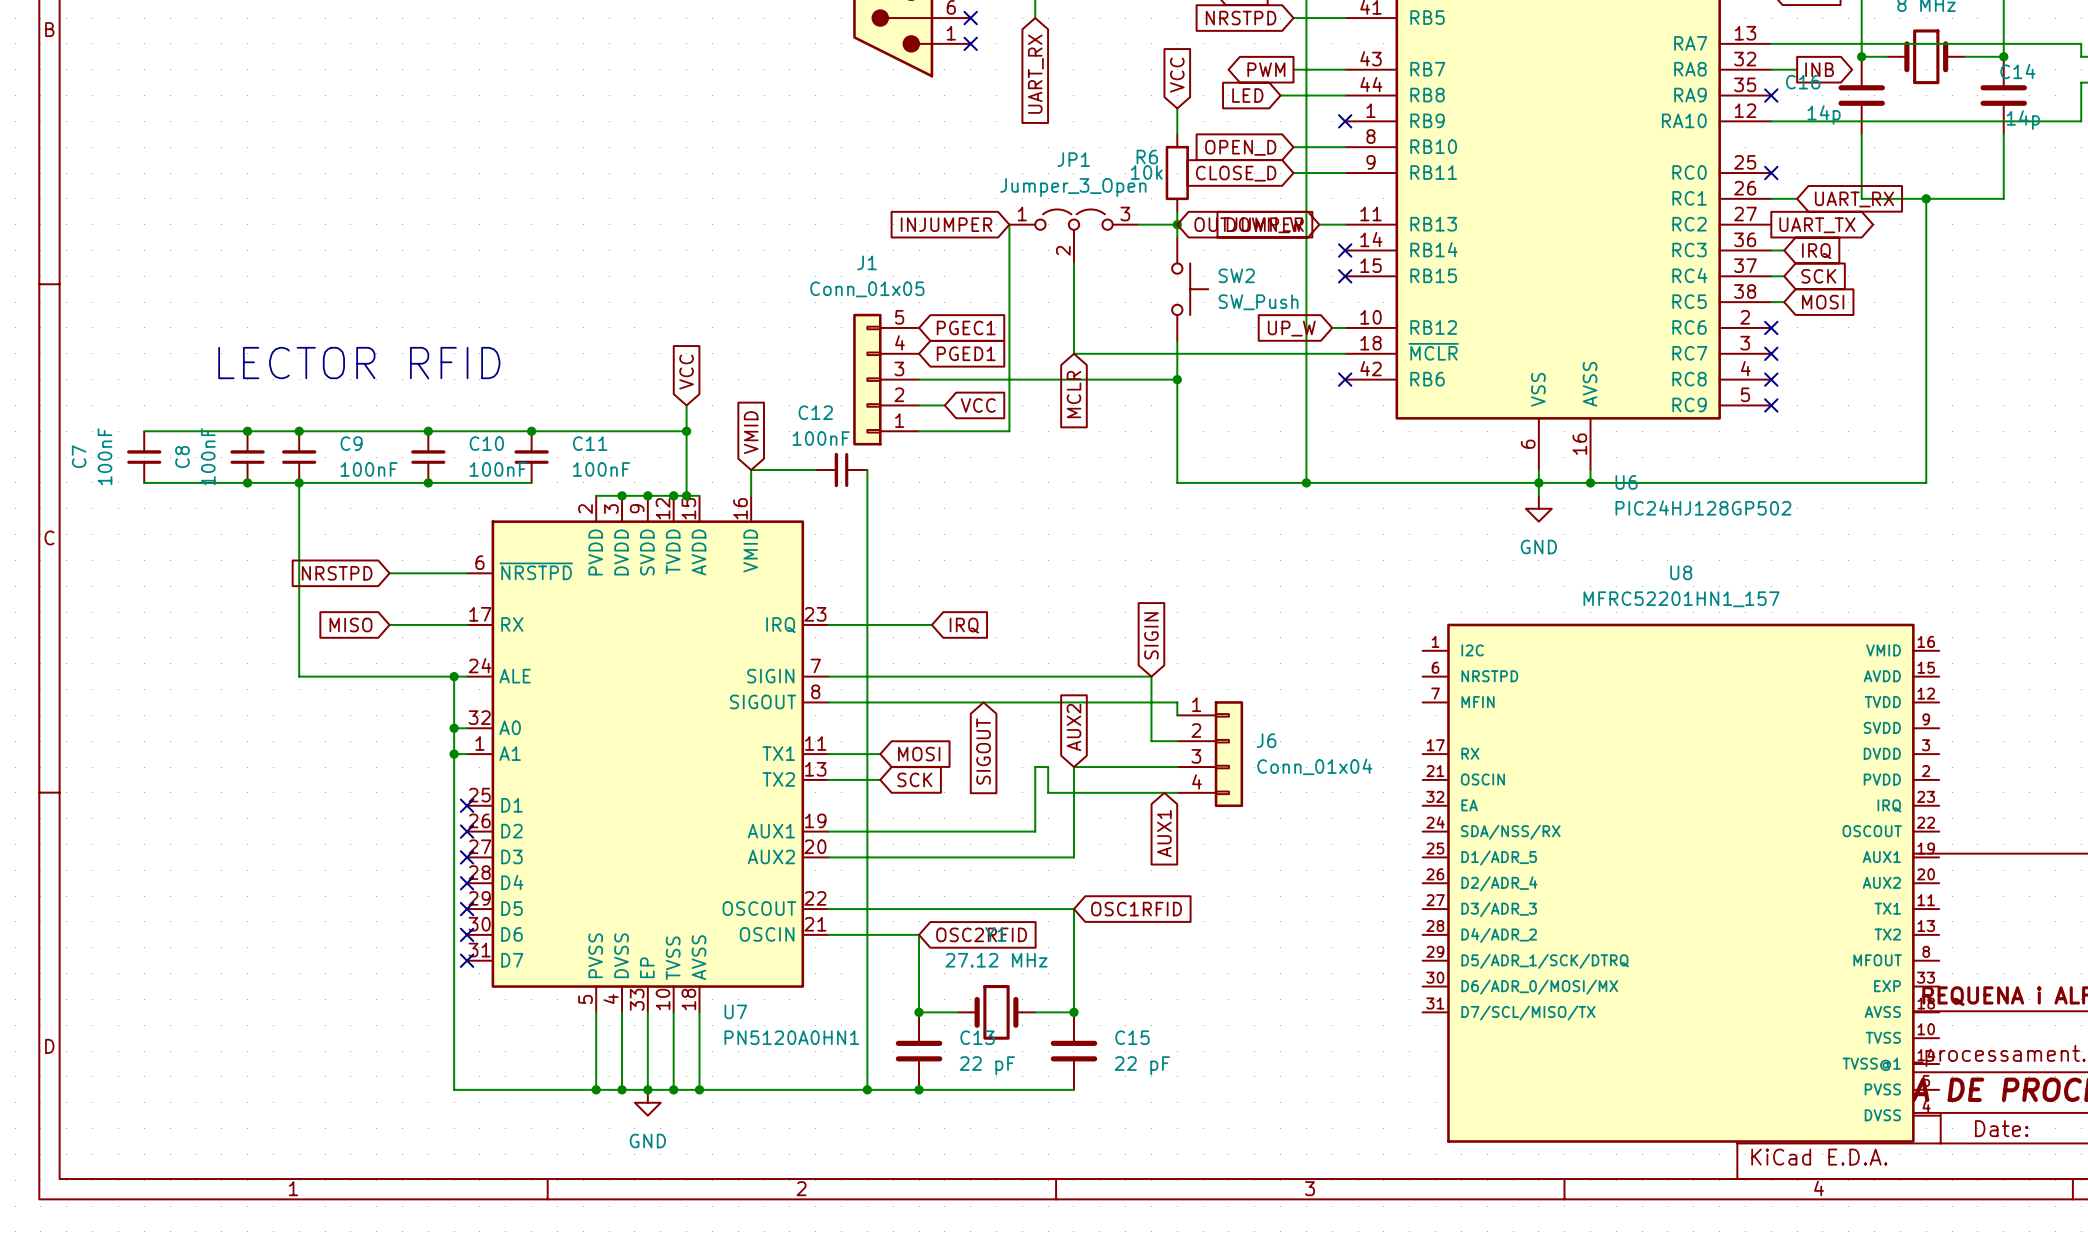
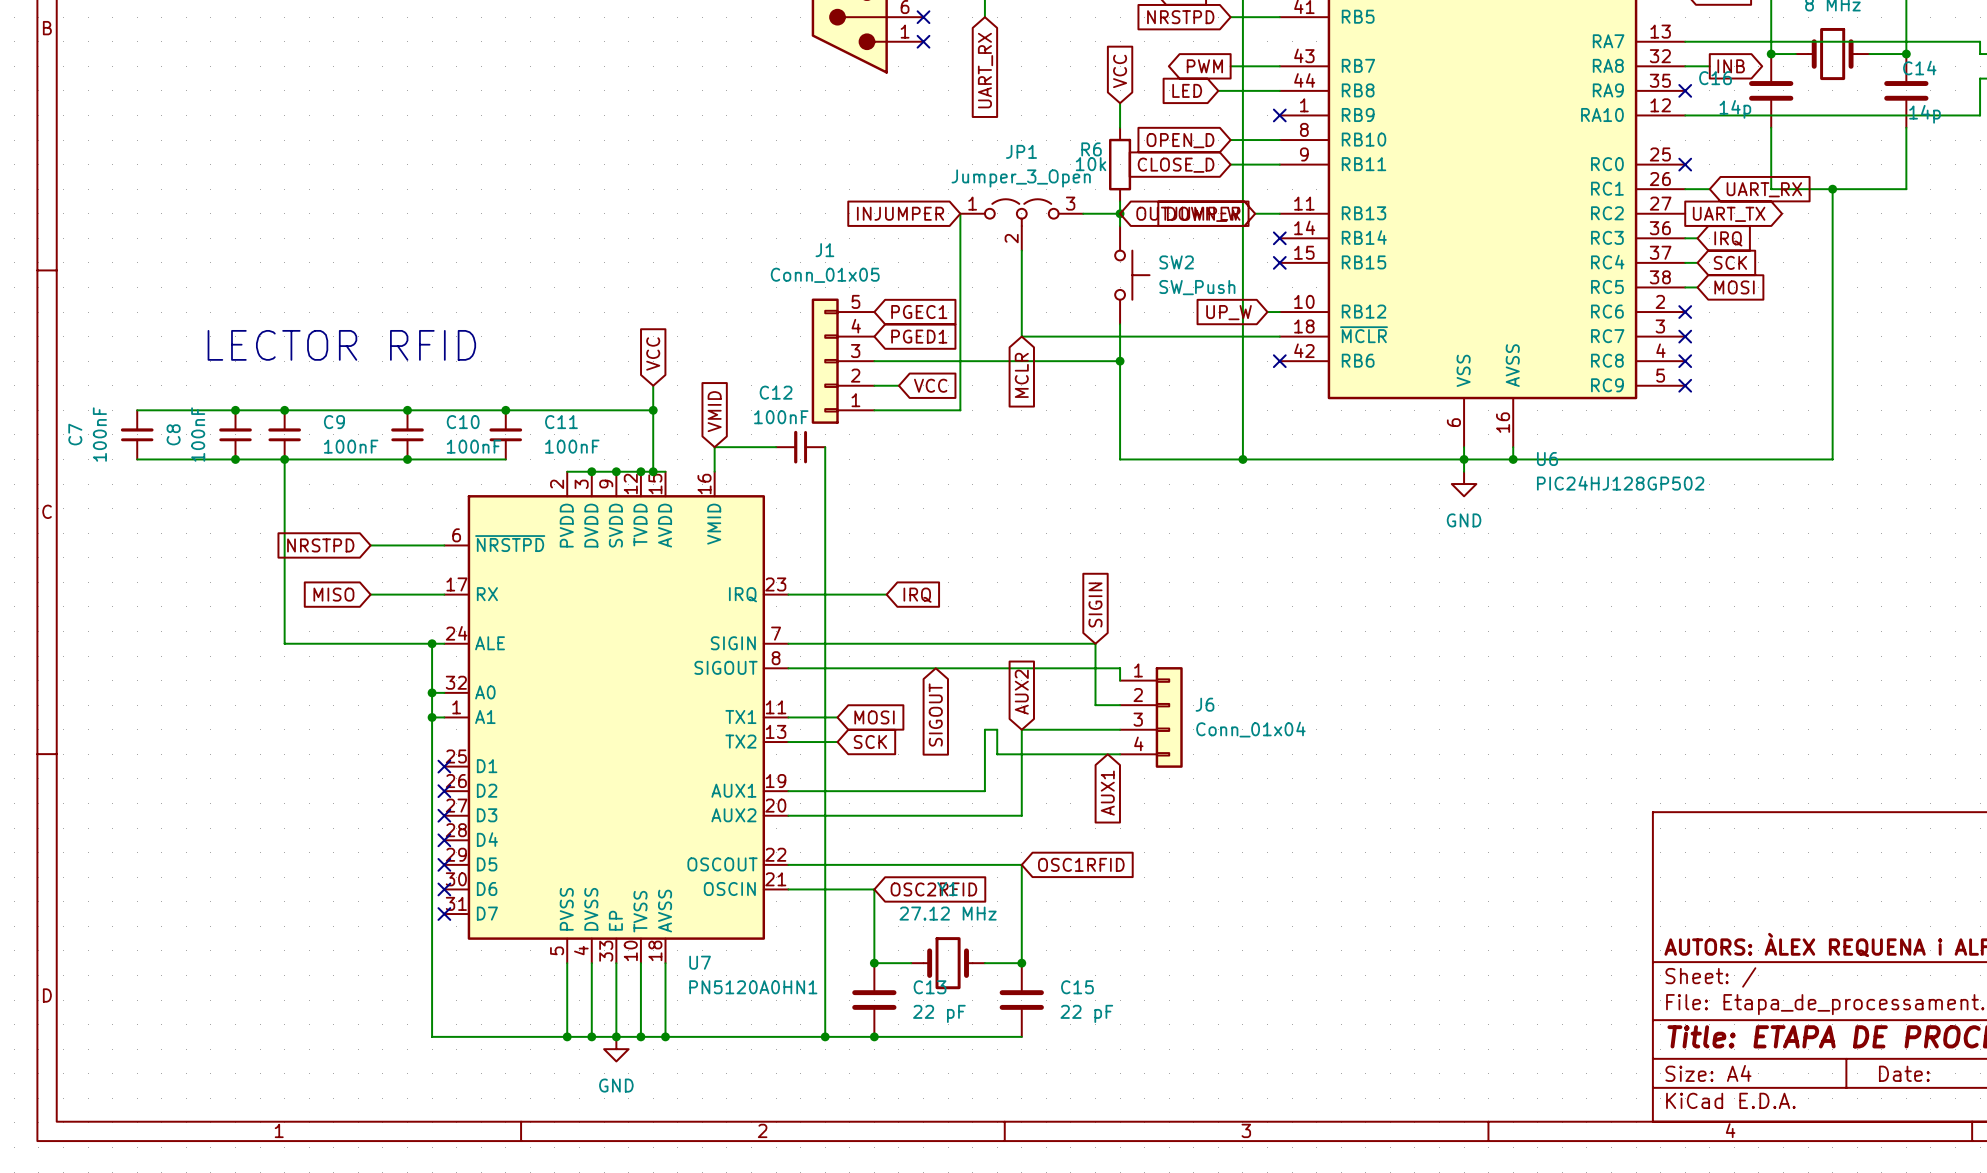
U8: MFRC52201HN1_157 (1680, 883) -> none

